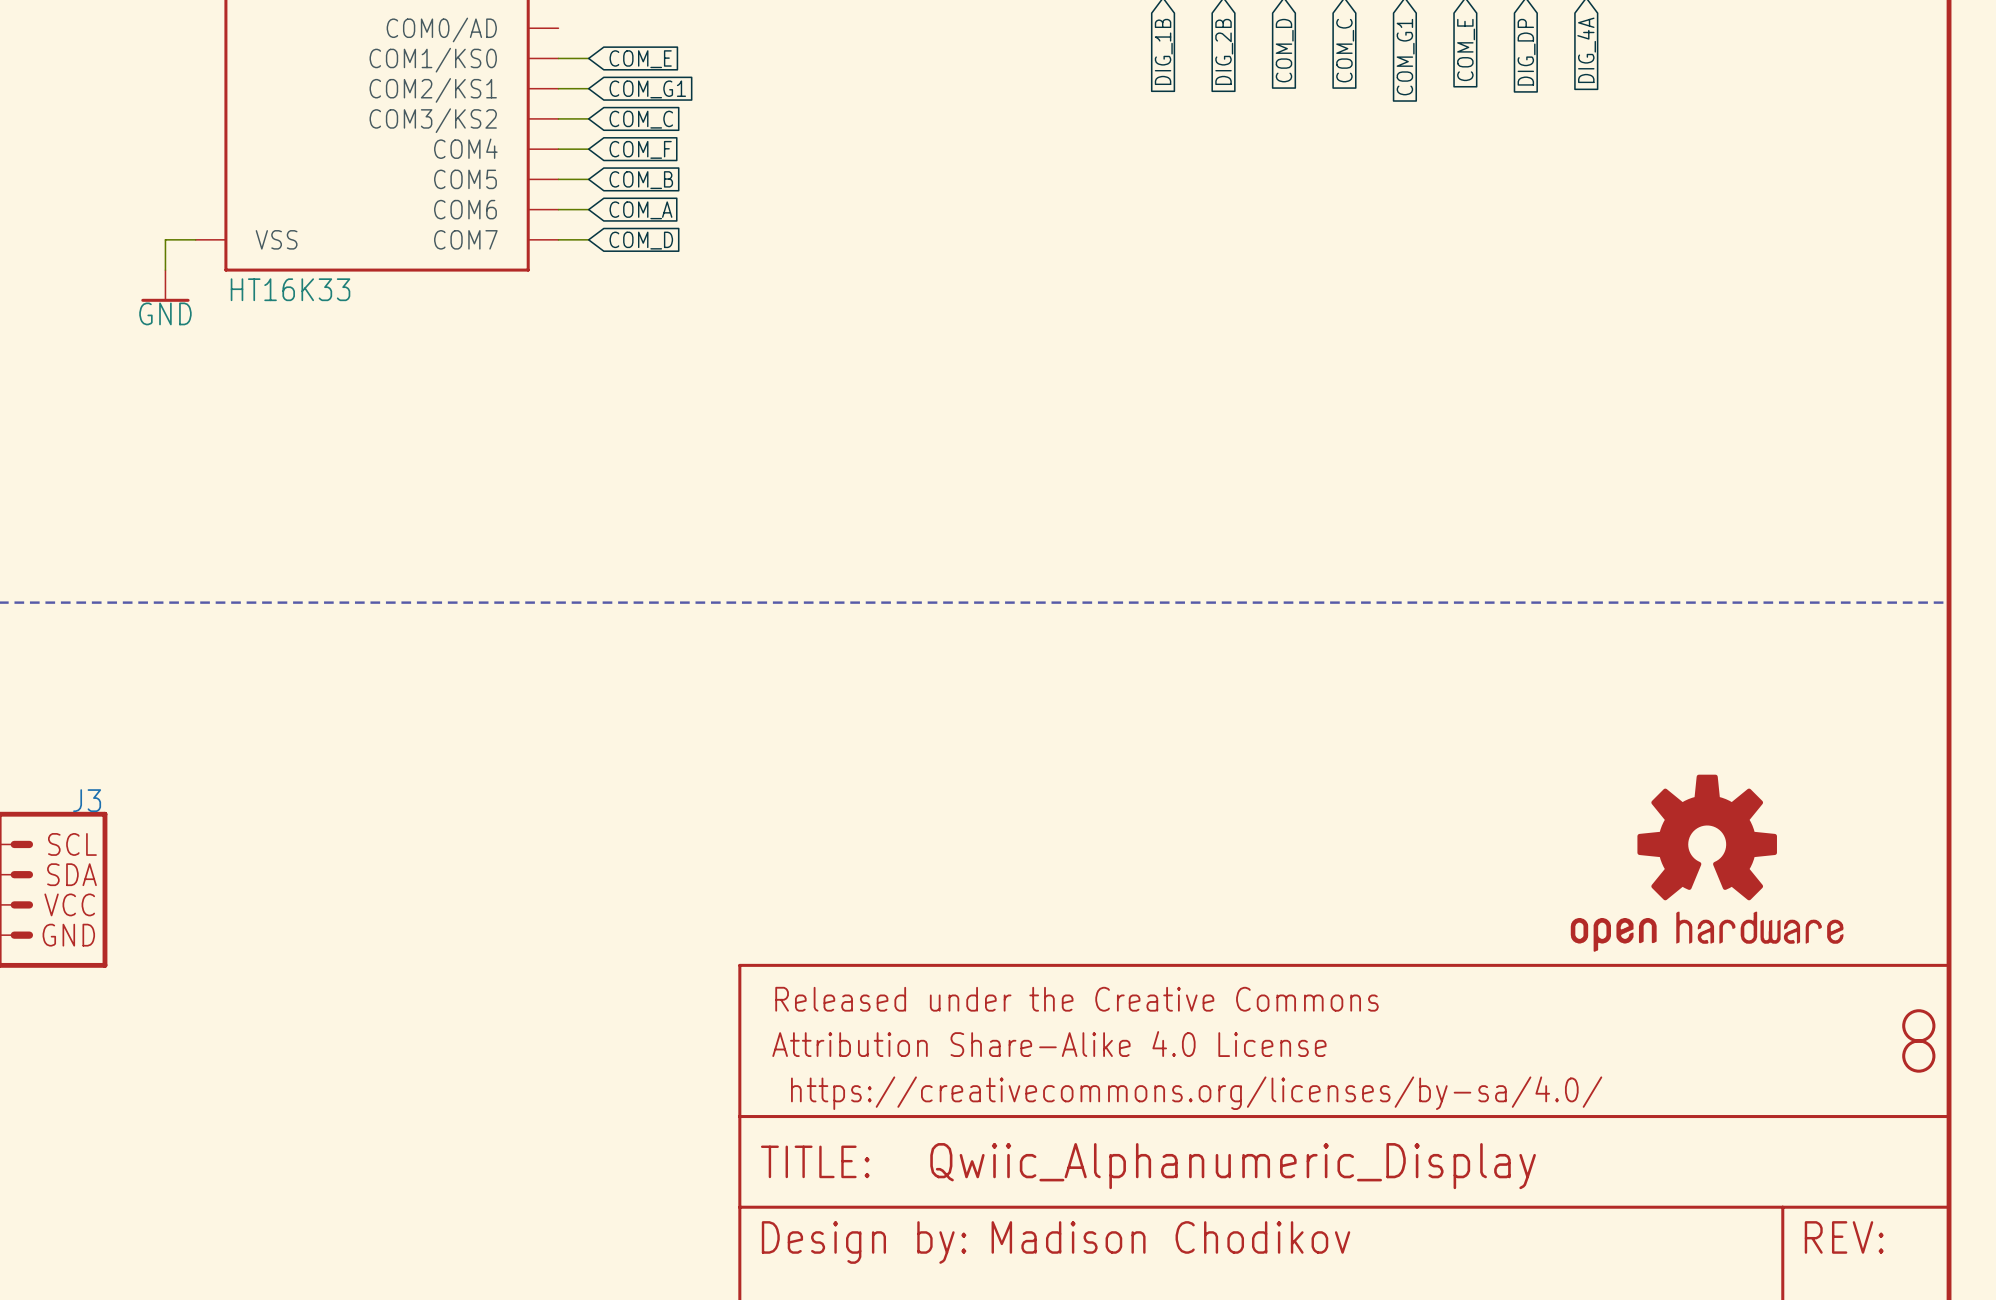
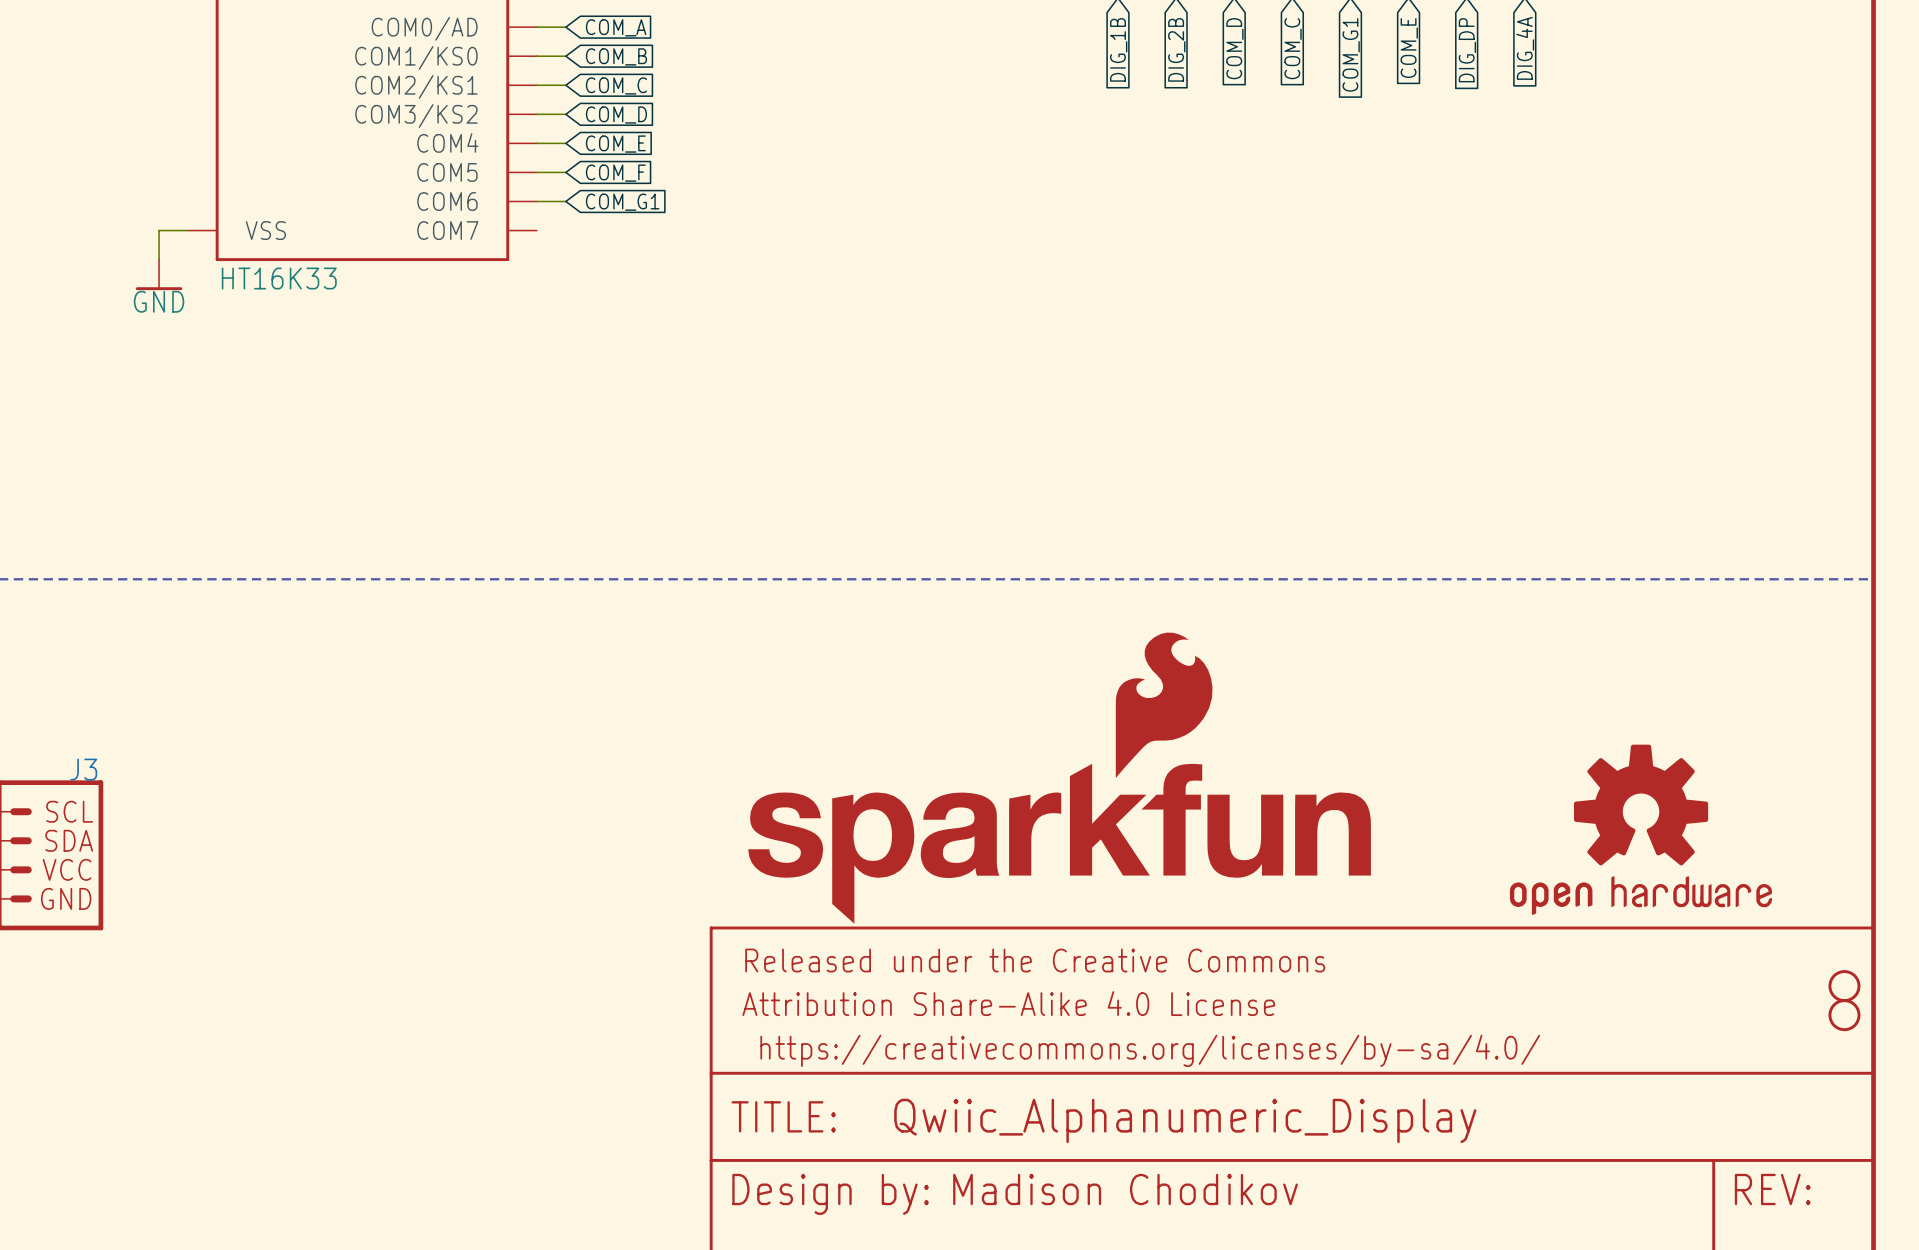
global label: none -> COM_A (616, 27)
global label: COM_E (640, 59) -> COM_B (616, 56)
global label: COM_G1 (647, 89) -> COM_C (616, 85)
global label: COM_C (641, 119) -> COM_D (616, 115)
global label: COM_F (640, 149) -> COM_E (615, 144)
global label: COM_B (641, 180) -> COM_F (615, 173)
global label: COM_A (640, 210) -> COM_G1 (622, 202)
wire: (558, 239) (588, 239) -> (536, 27) (565, 27)
global label: COM_D (641, 240) -> none
part: none -> (1059, 778)

